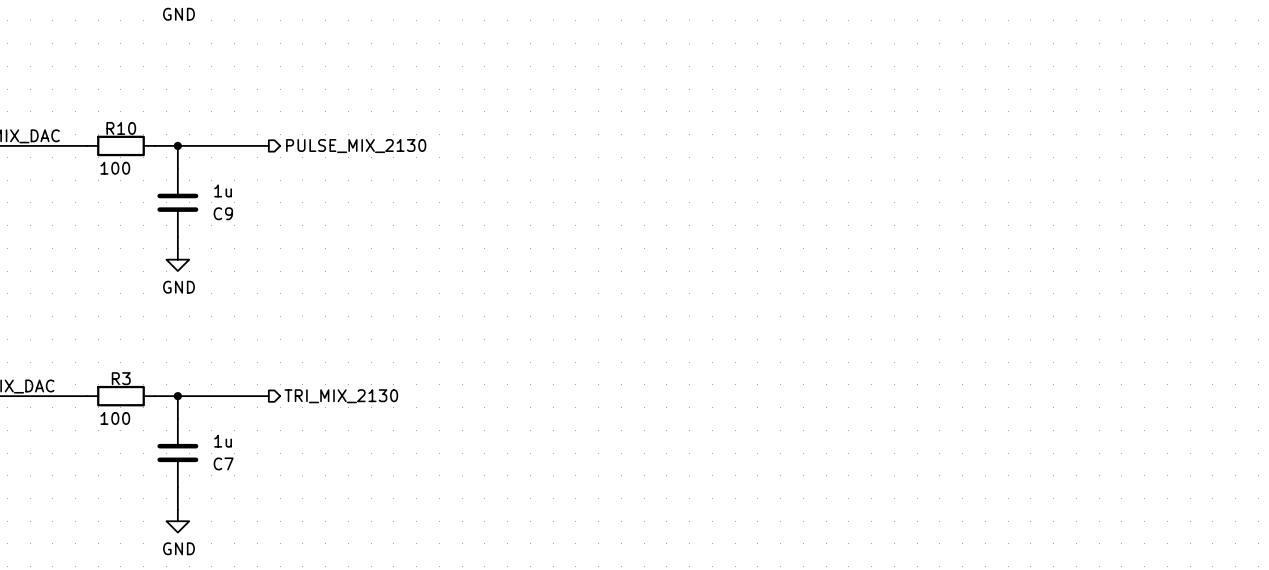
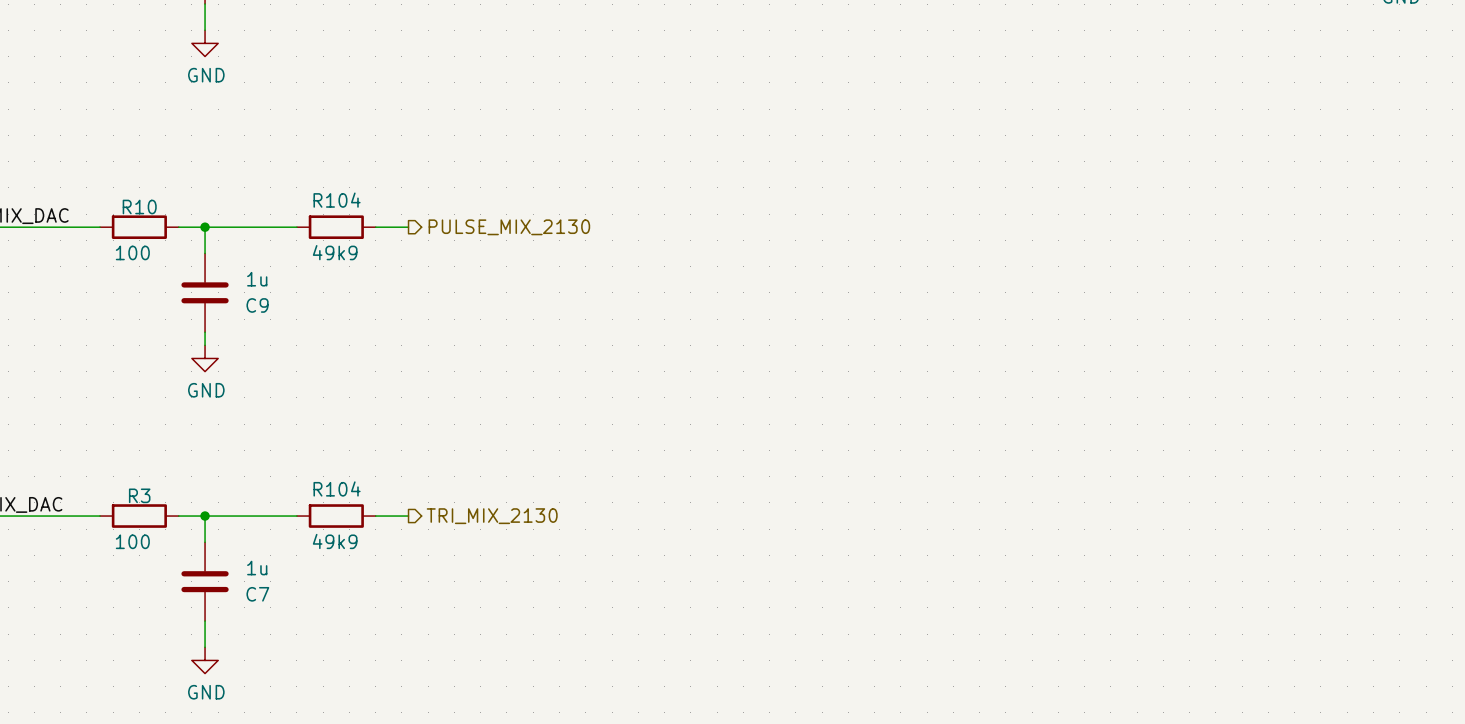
R104: none -> 49k9 (336, 227)
wire: none -> (375, 227) (408, 227)
hierarchical label position: PULSE_MIX_2130 (356, 146) -> PULSE_MIX_2130 (509, 227)
R104: none -> 49k9 (336, 516)
wire: none -> (375, 516) (408, 516)
hierarchical label position: TRI_MIX_2130 (341, 396) -> TRI_MIX_2130 (492, 516)

